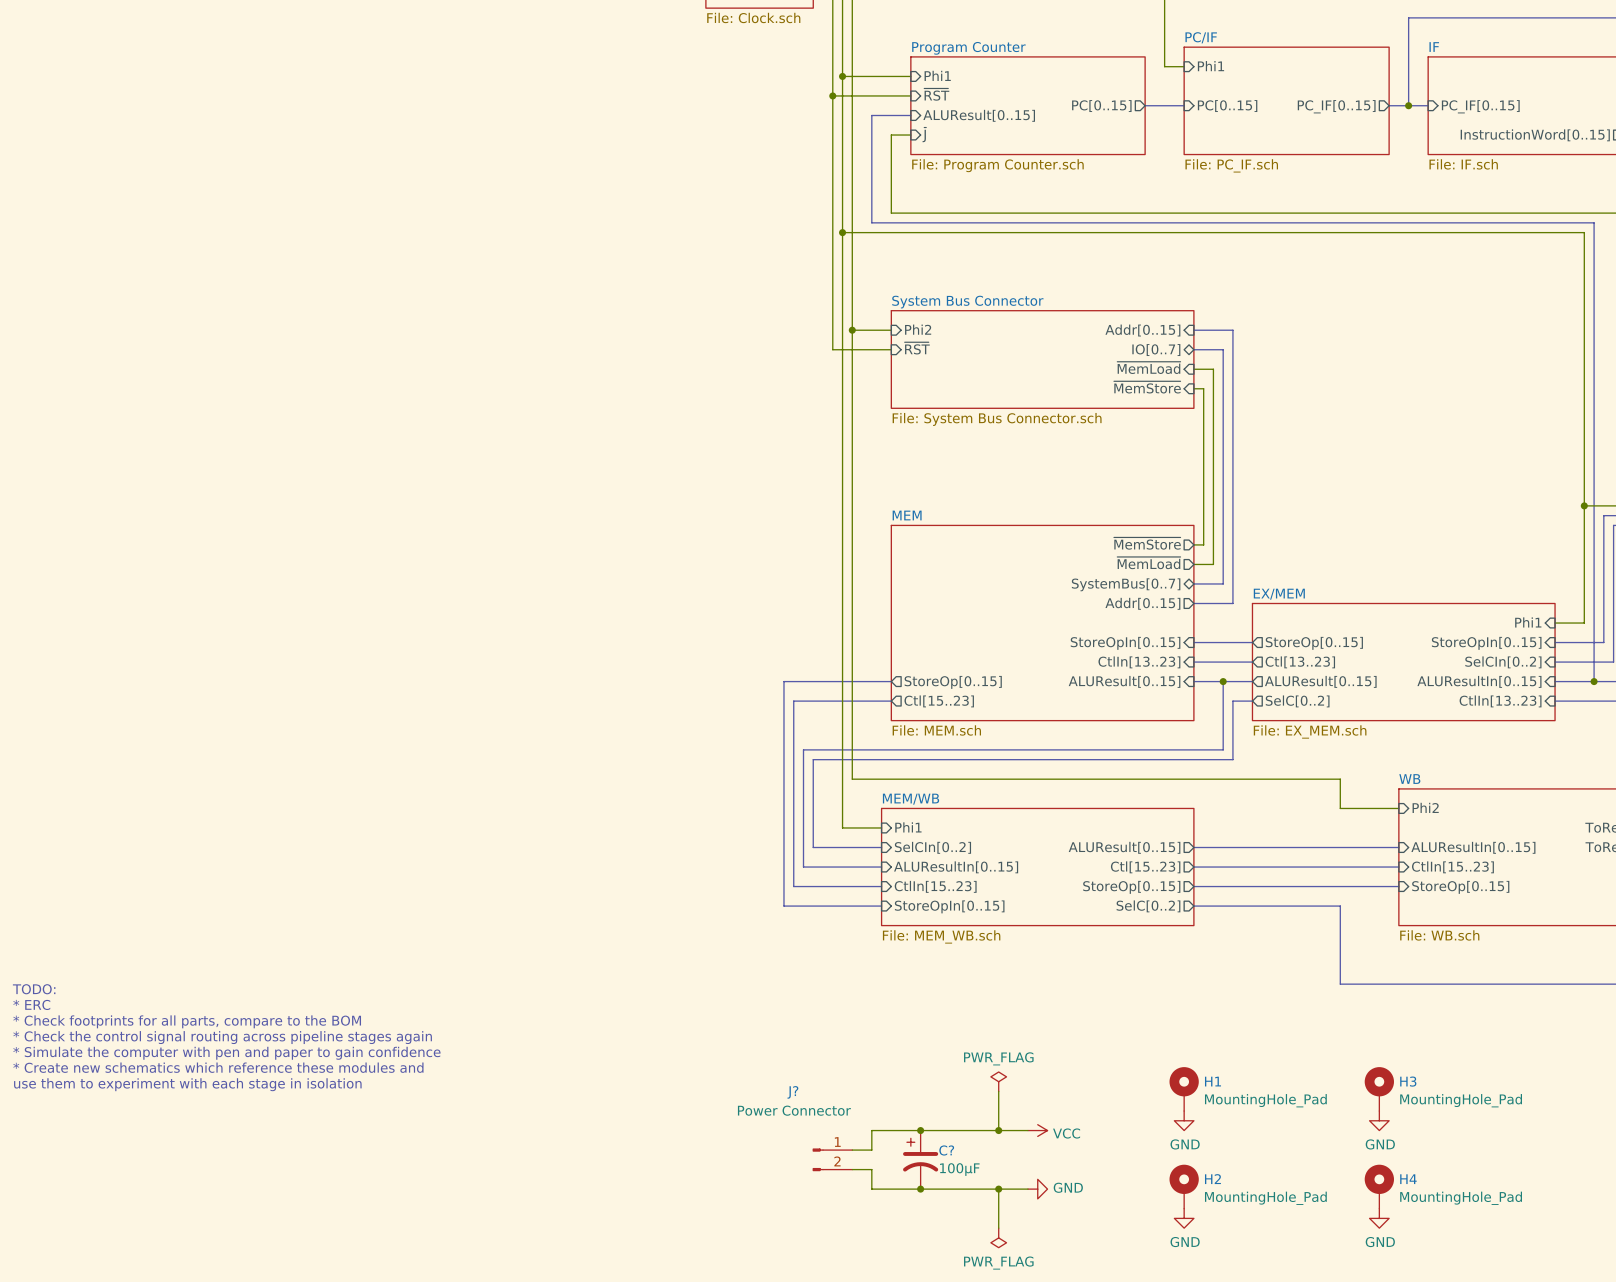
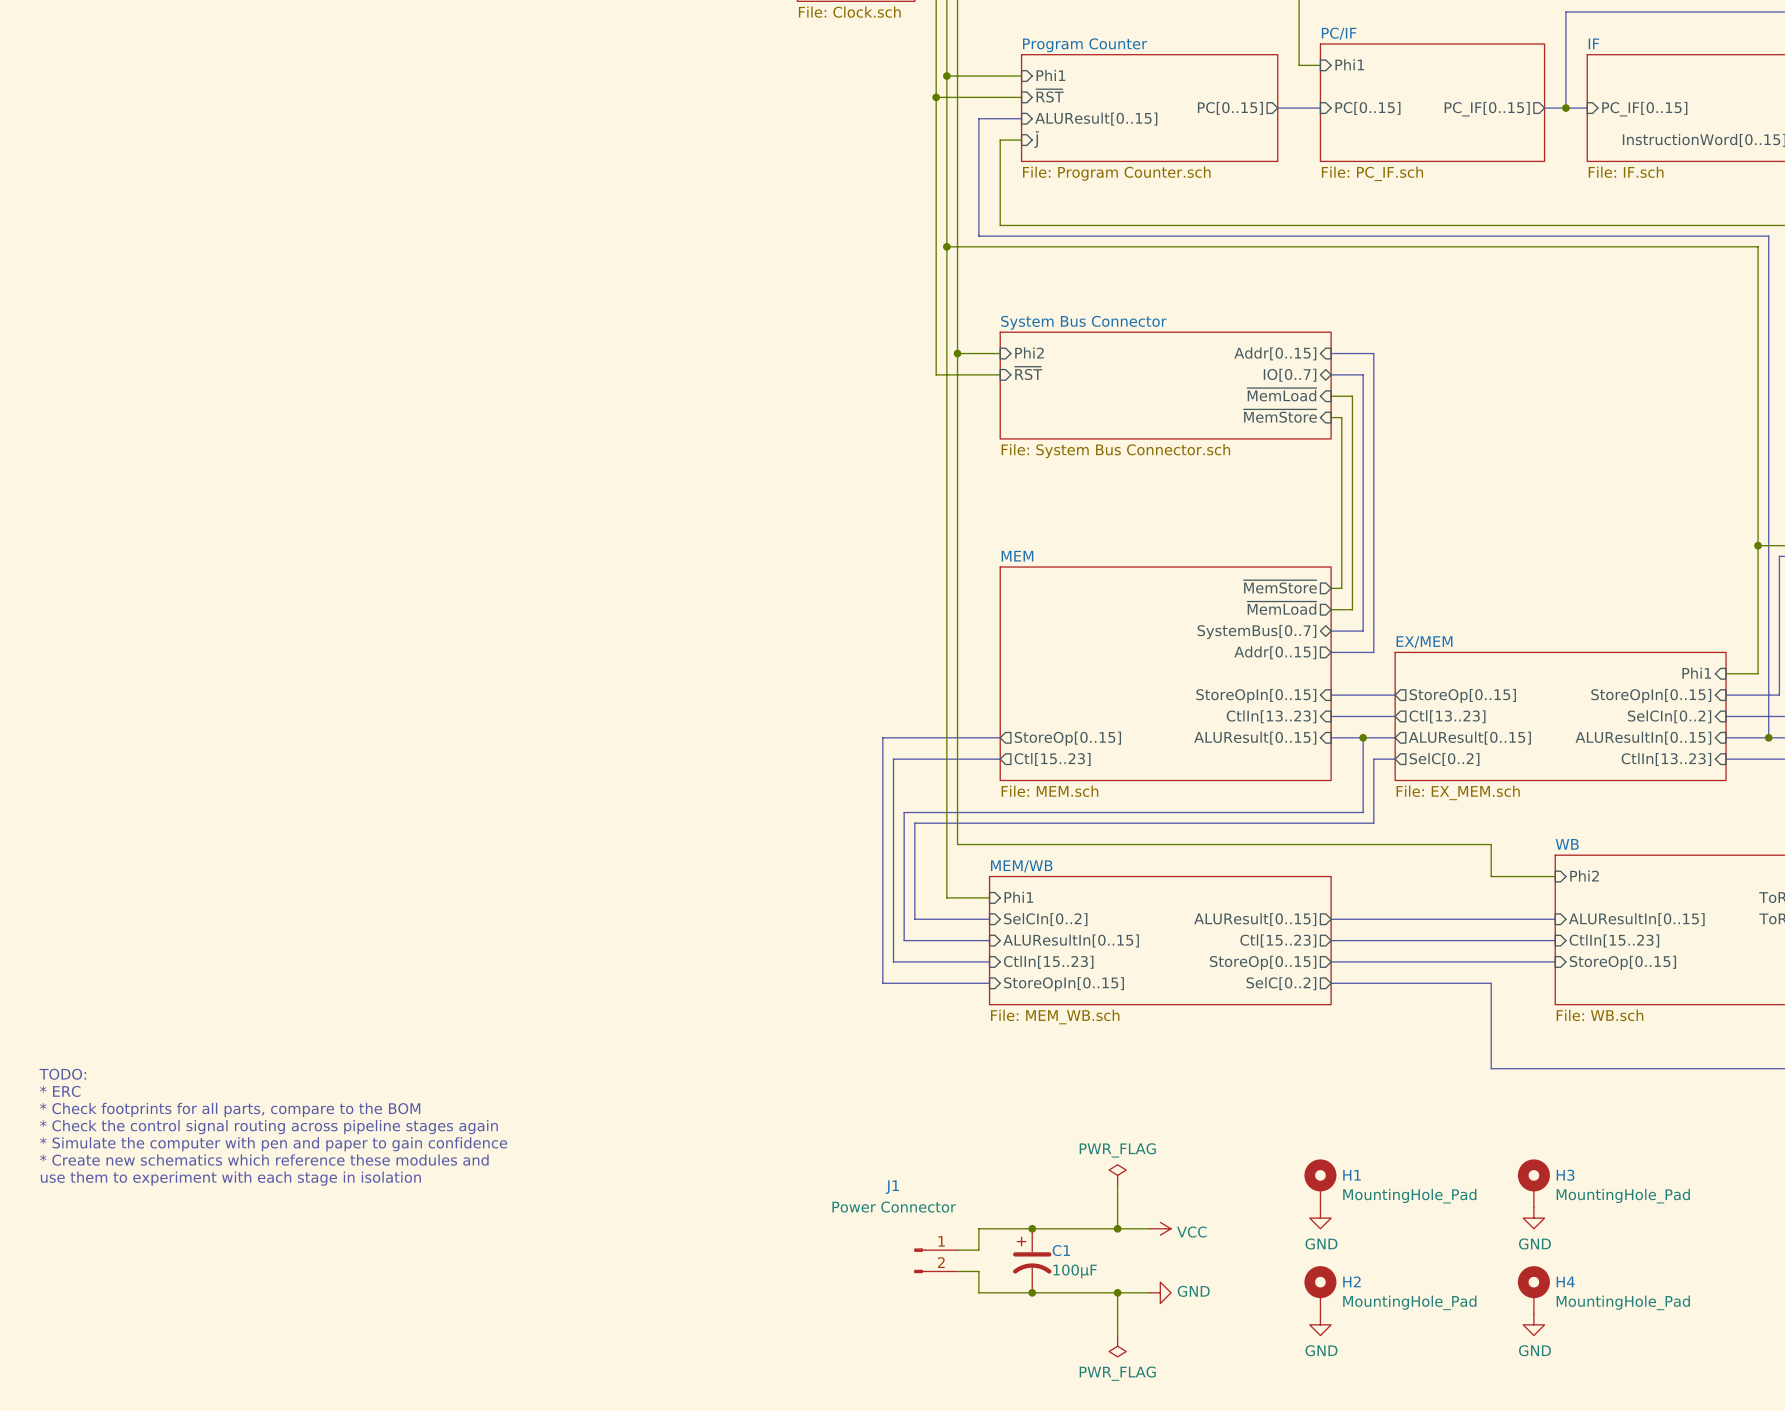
J? name: J? (792, 1092) -> J1 (892, 1187)
C? name: C? (946, 1150) -> C1 (1061, 1250)

